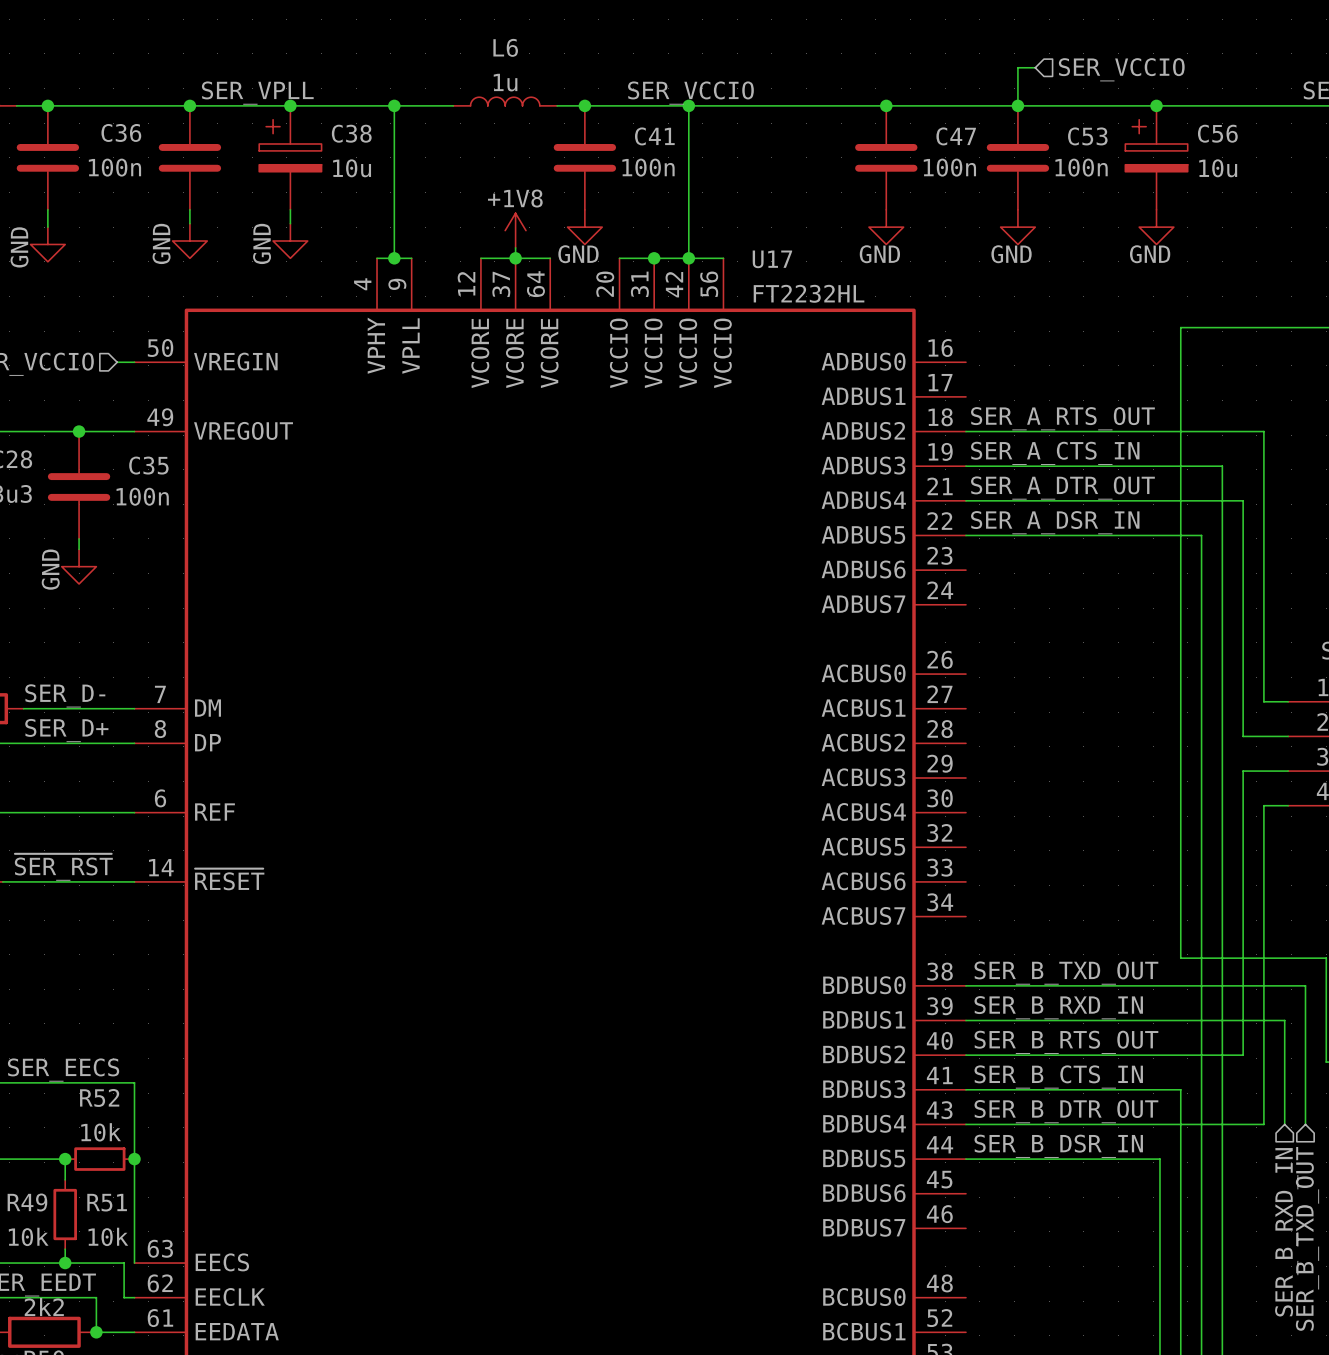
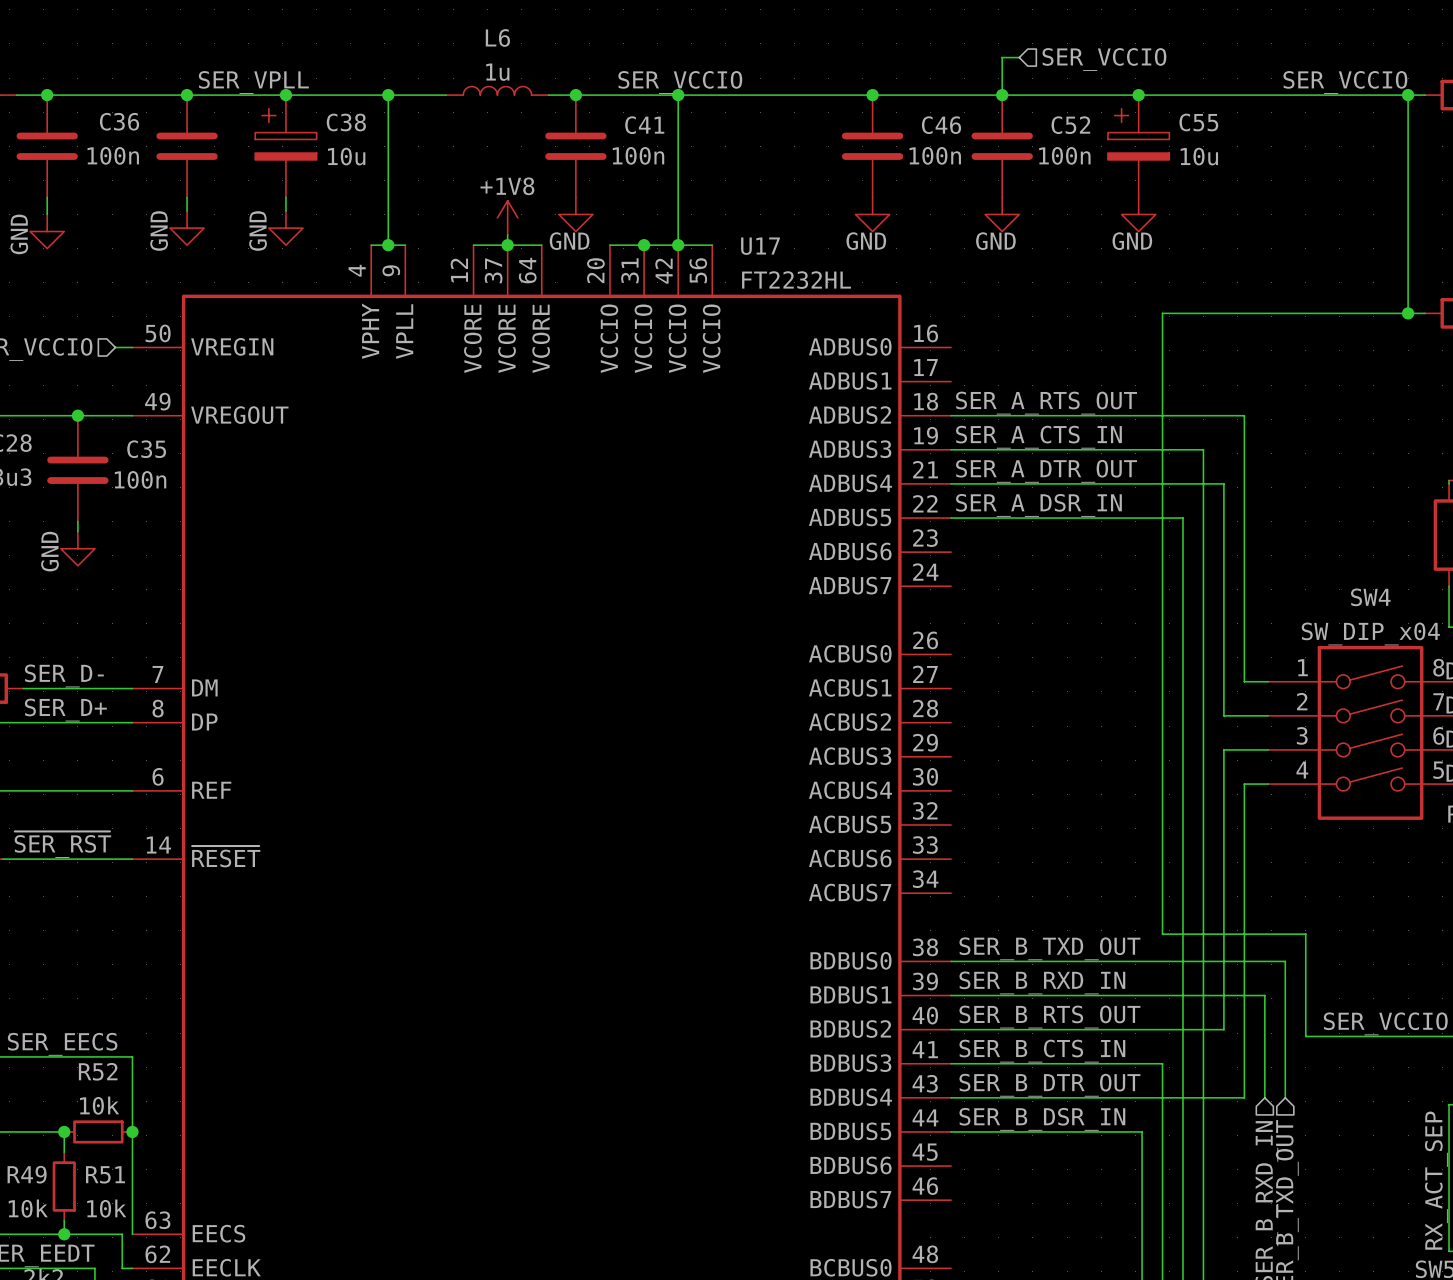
C56 name: C56 (1217, 133) -> C55 (1198, 122)
C47 name: C47 (956, 136) -> C46 (941, 125)
C53 name: C53 (1087, 136) -> C52 (1070, 125)

